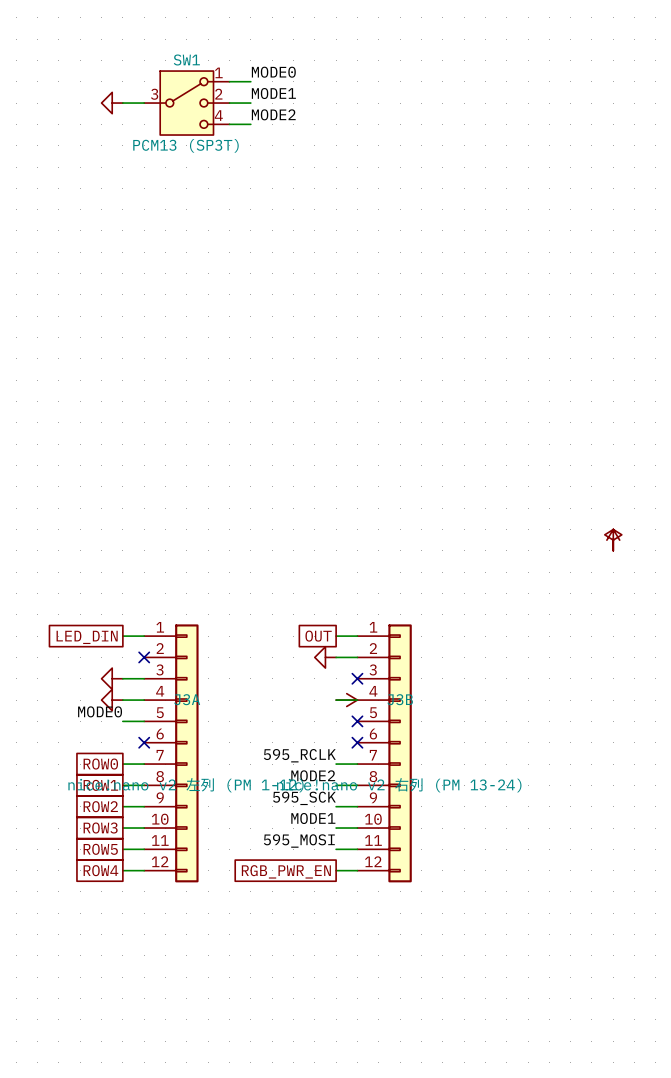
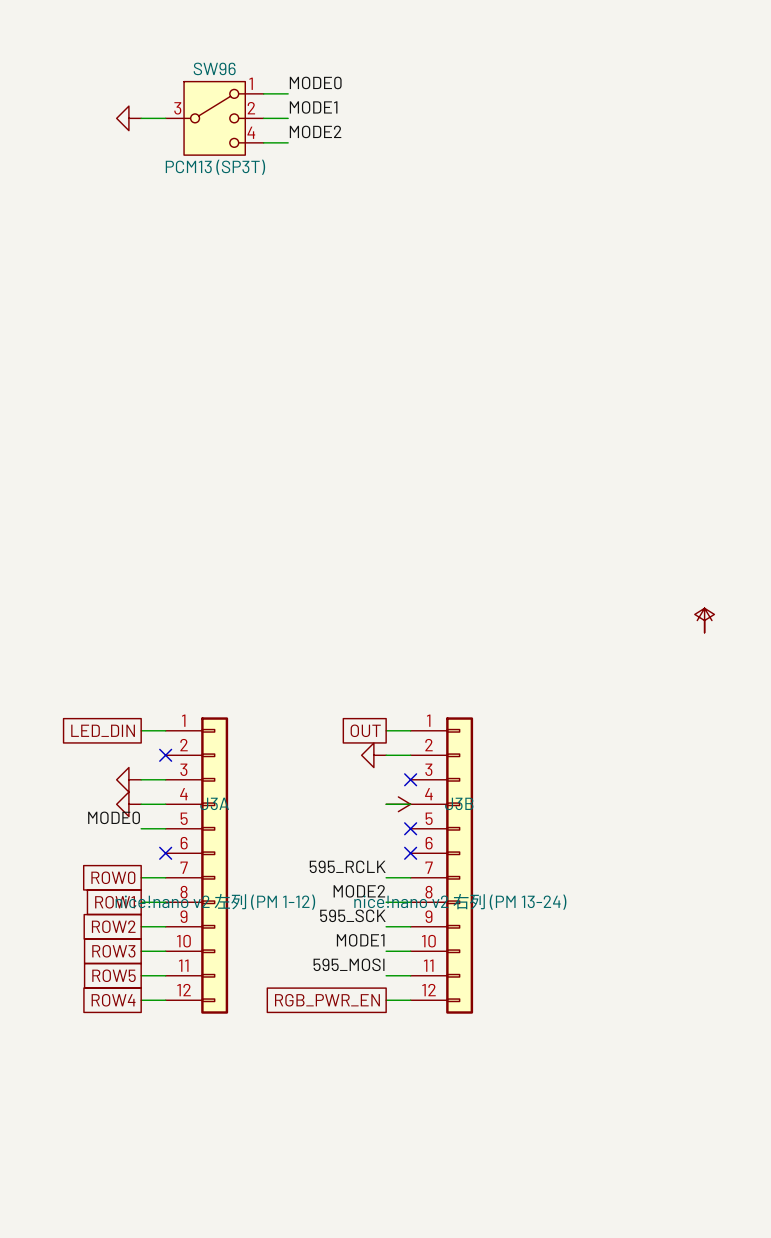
SW1 name: SW1 (186, 59) -> SW96 (214, 68)

